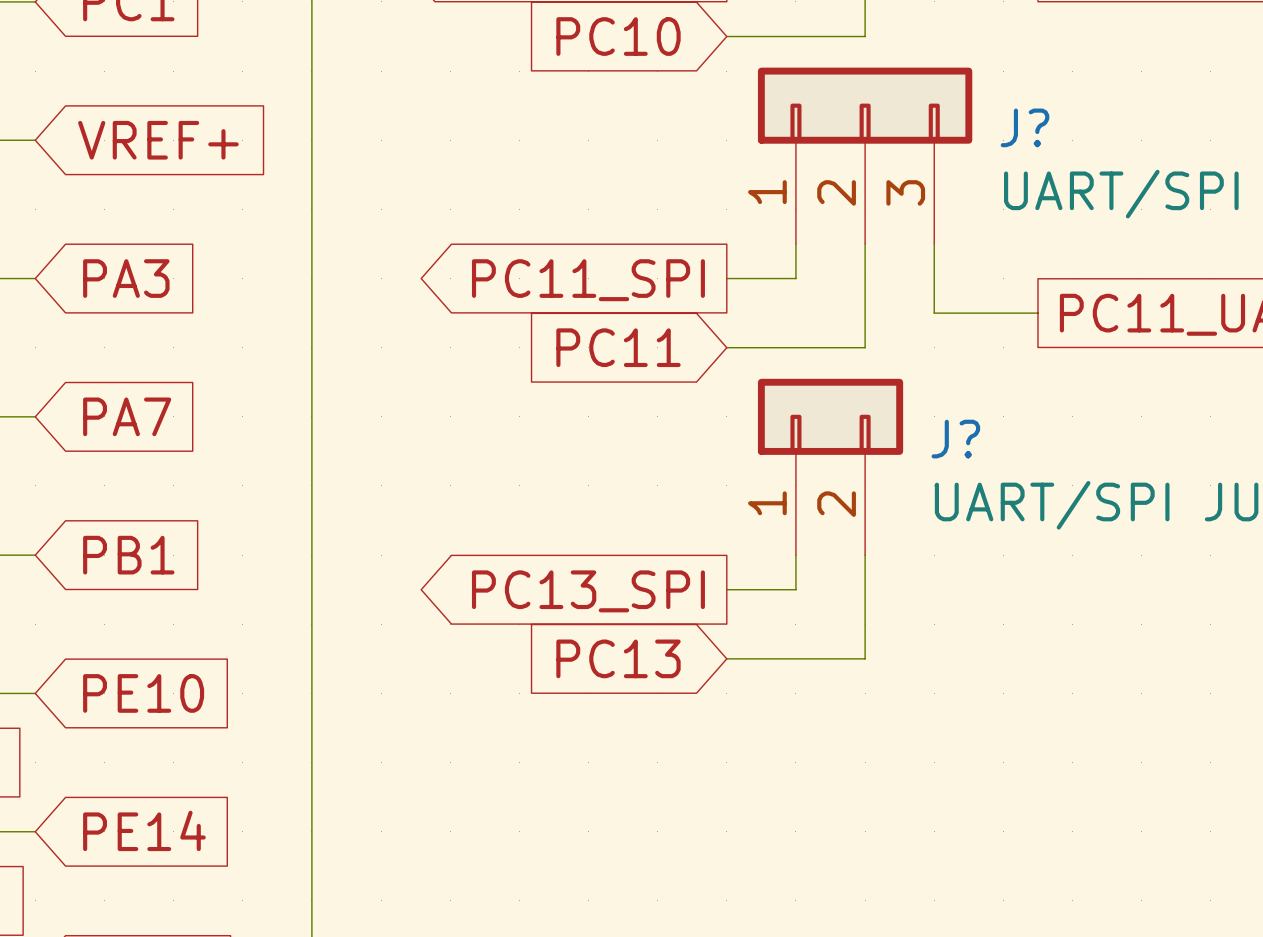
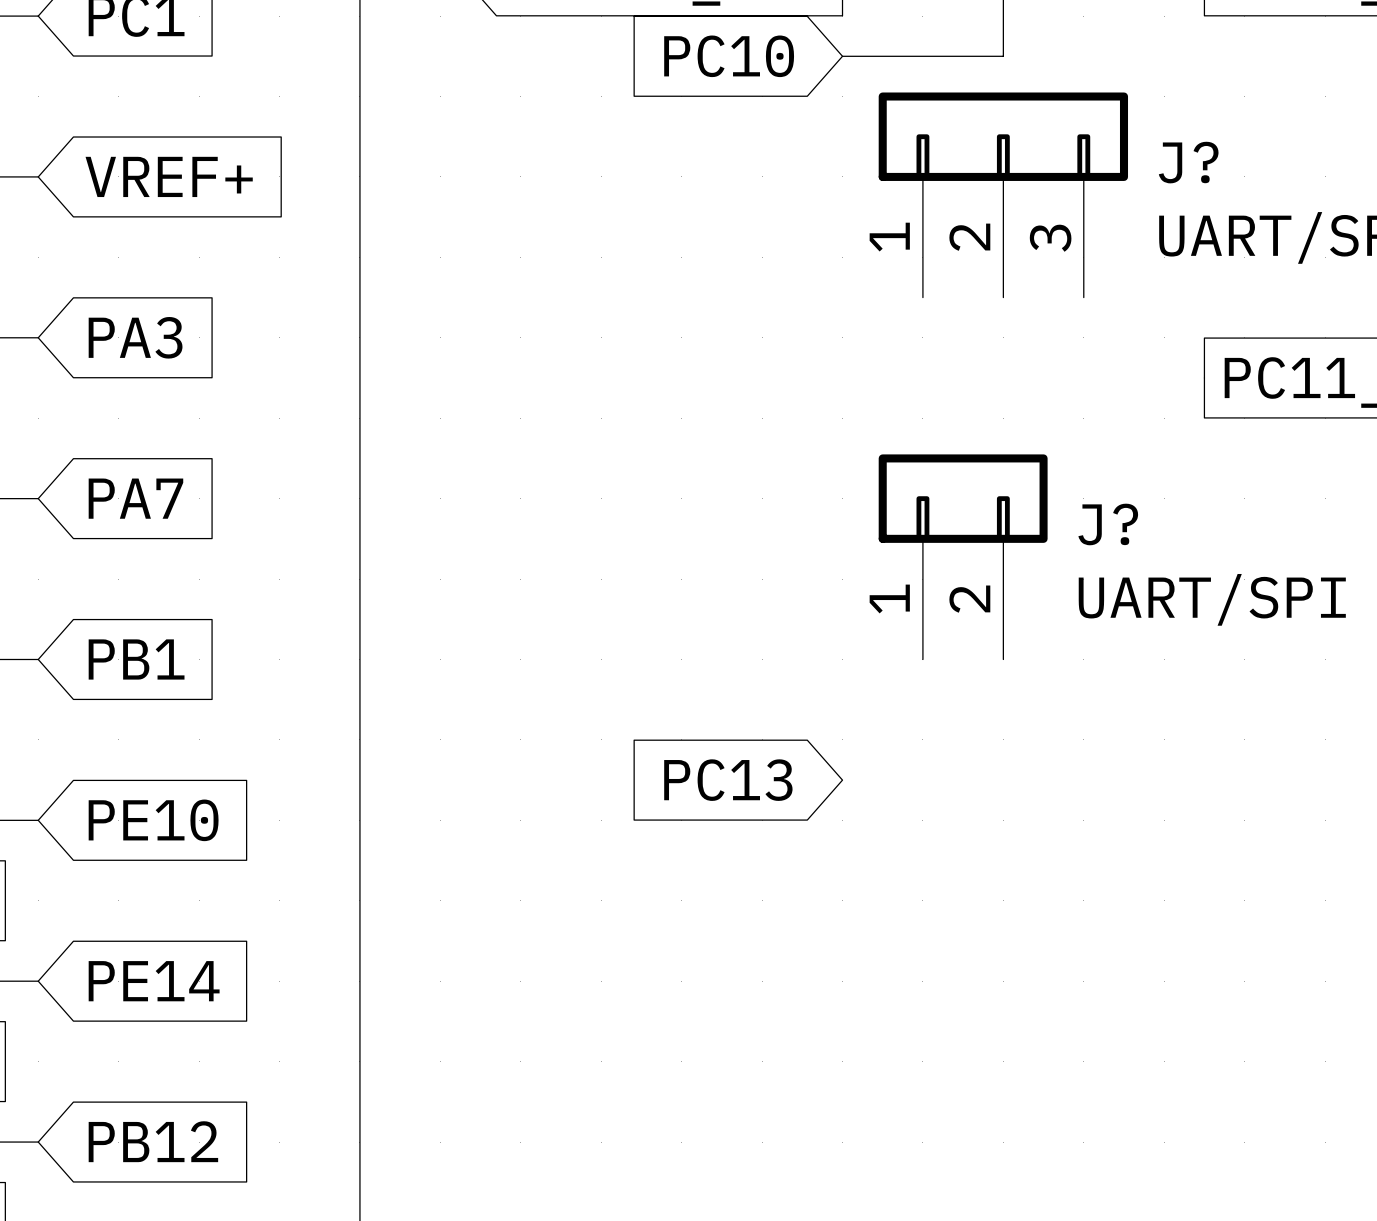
wire: (795, 243) (795, 278) (726, 278) -> none
wire: (865, 243) (865, 347) (726, 347) -> none
wire: (934, 243) (934, 313) (1037, 313) -> none
global label: PC11_SPI (588, 280) -> none
global label: PC11 (618, 347) -> none
wire: (795, 555) (795, 589) (726, 589) -> none
wire: (865, 555) (865, 658) (726, 658) -> none
global label: PC13_SPI (588, 591) -> none

